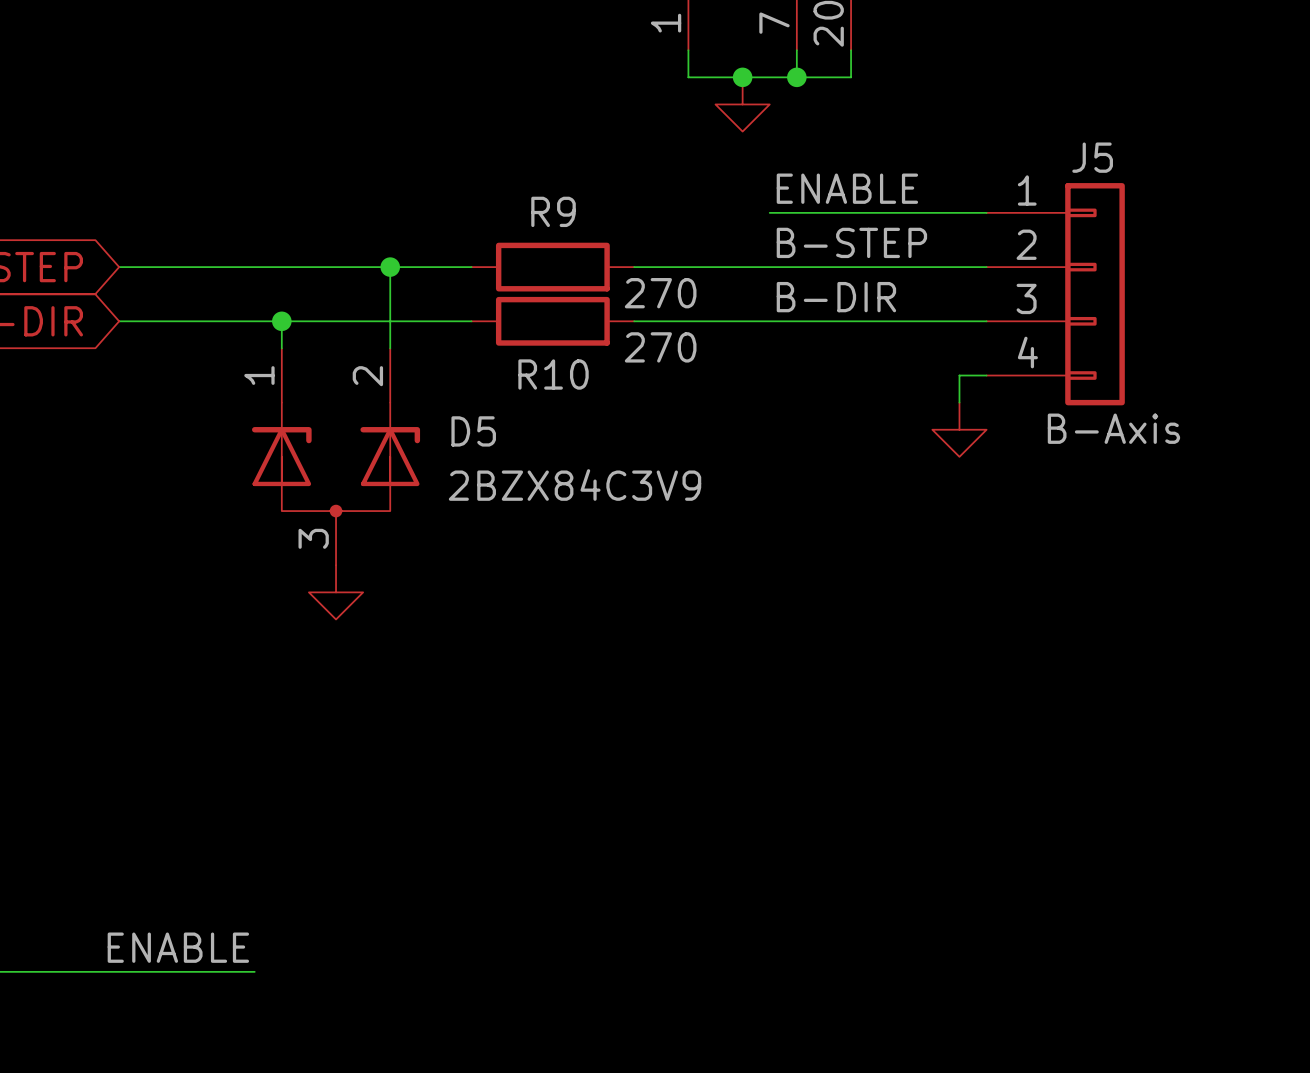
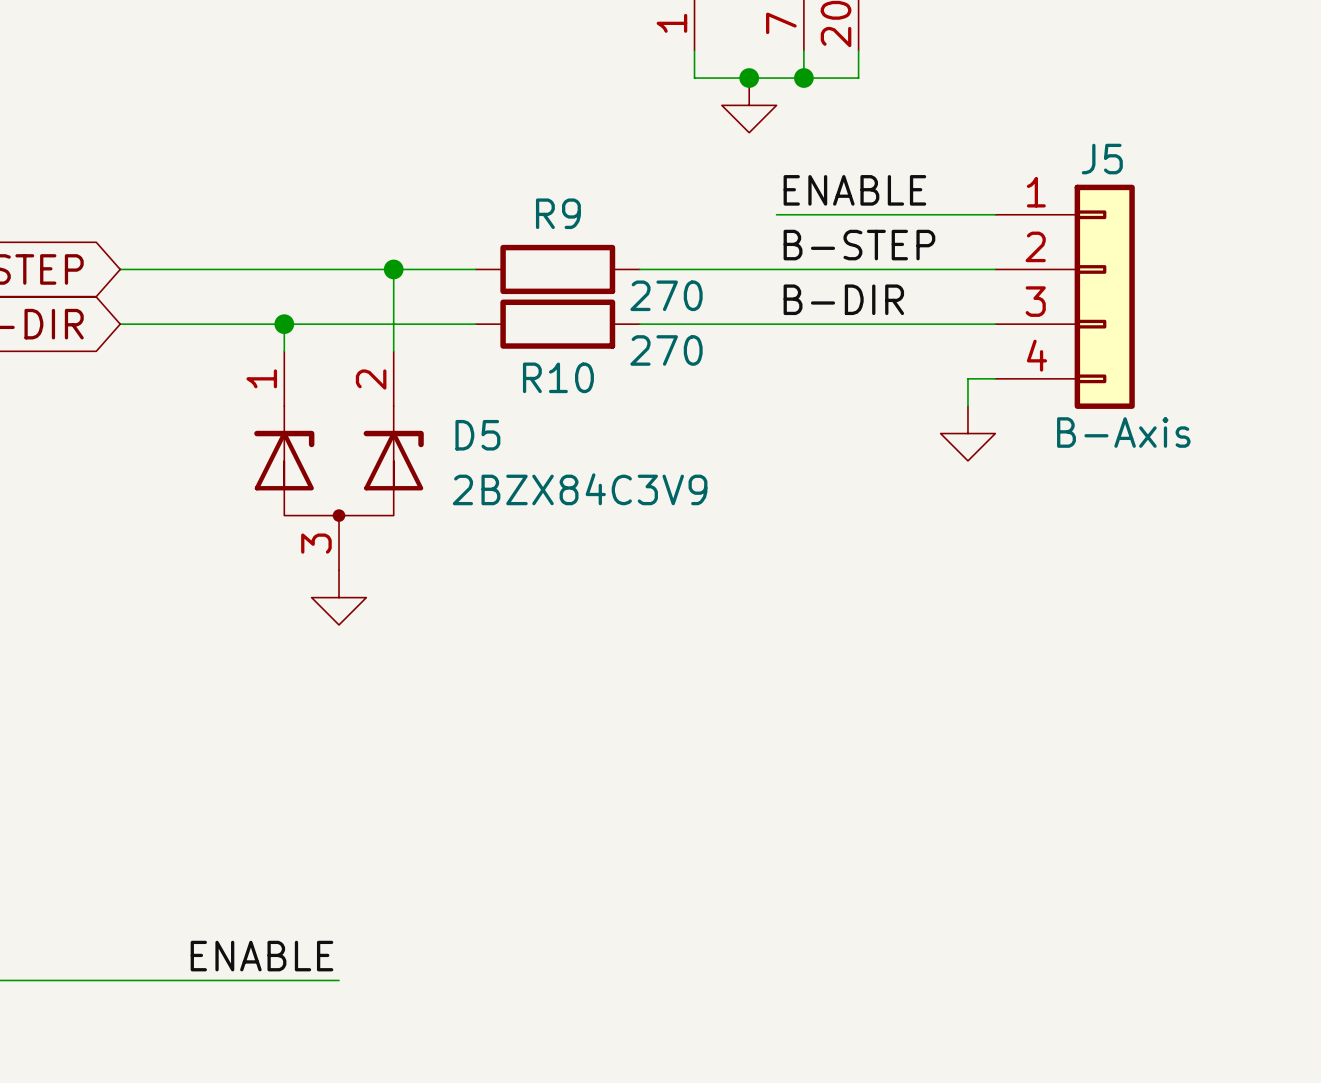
label position: ENABLE (178, 947) -> ENABLE (261, 956)
wire: none -> (256, 980) (339, 980)

